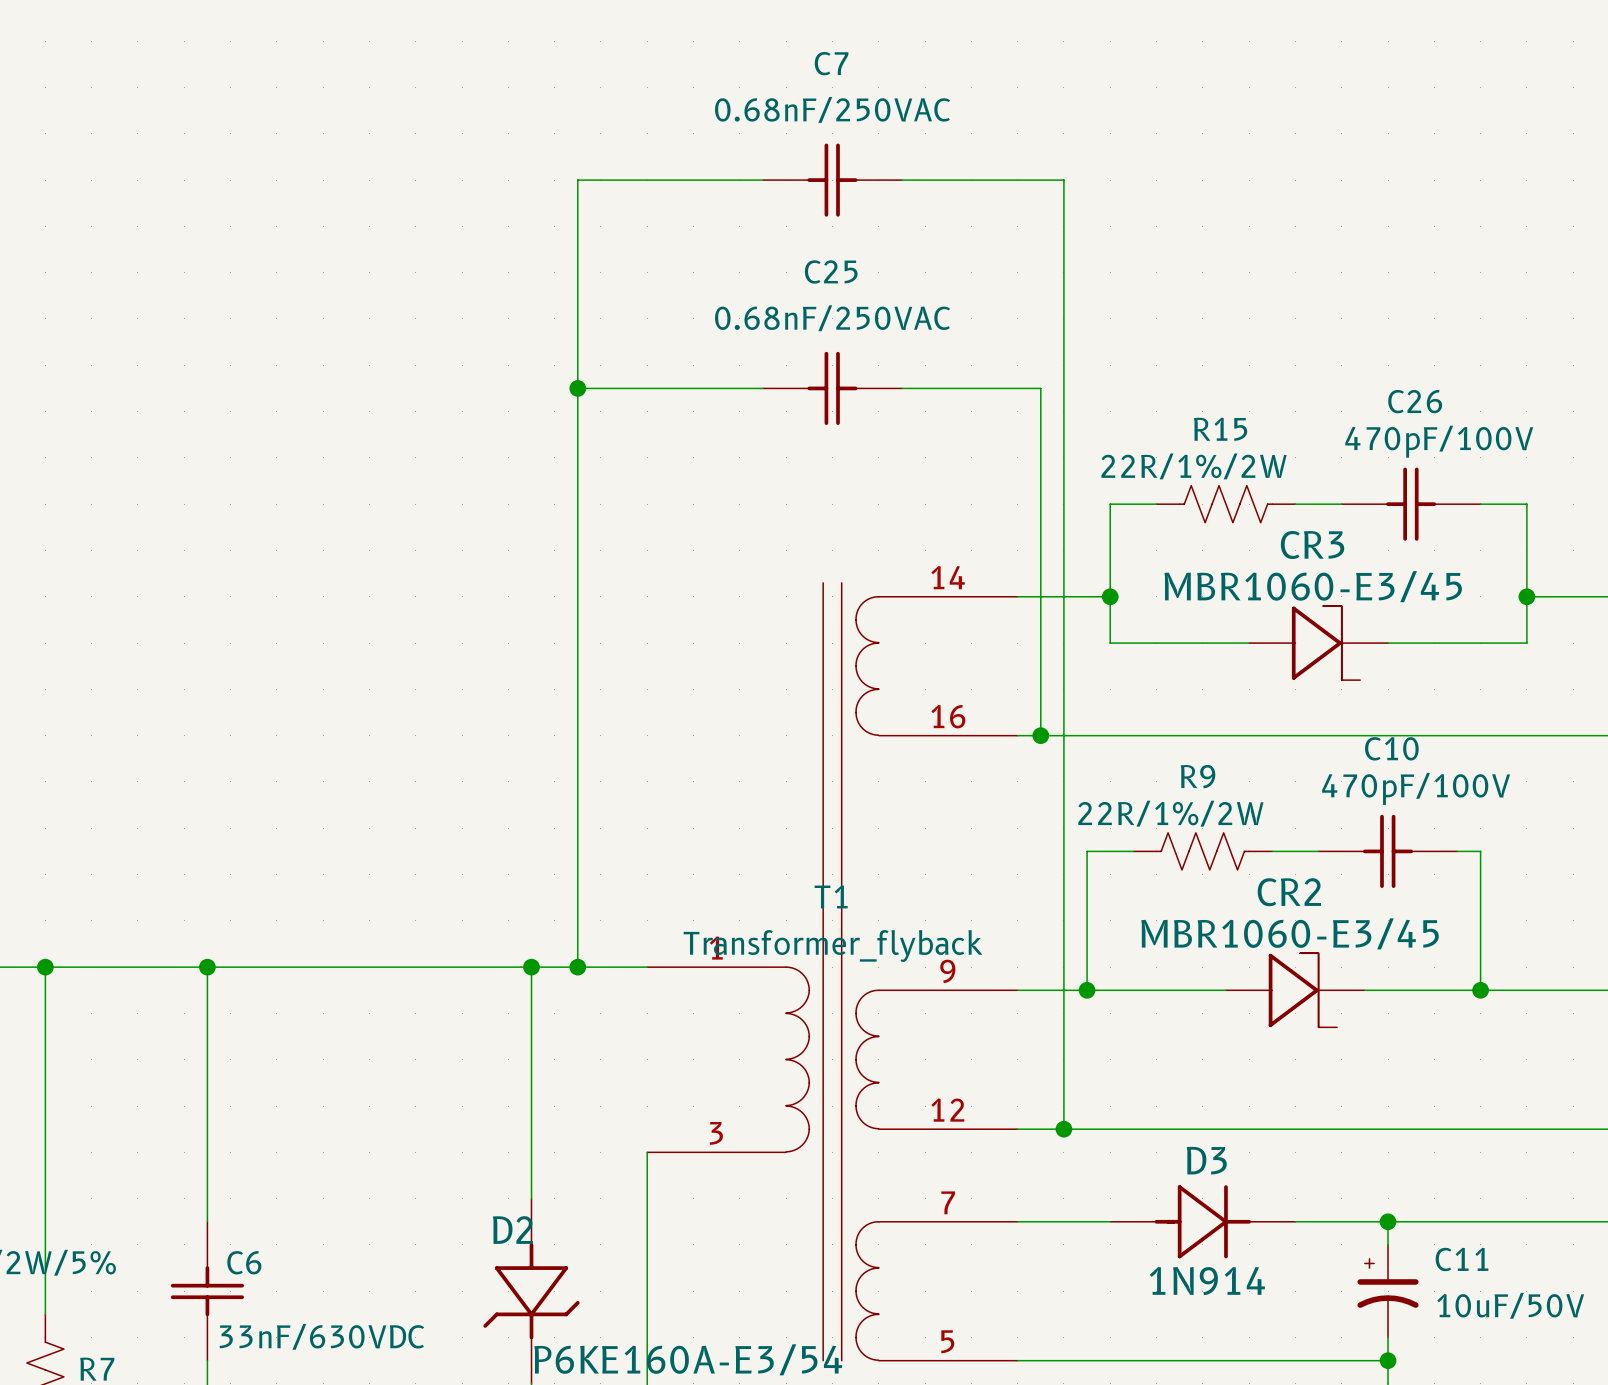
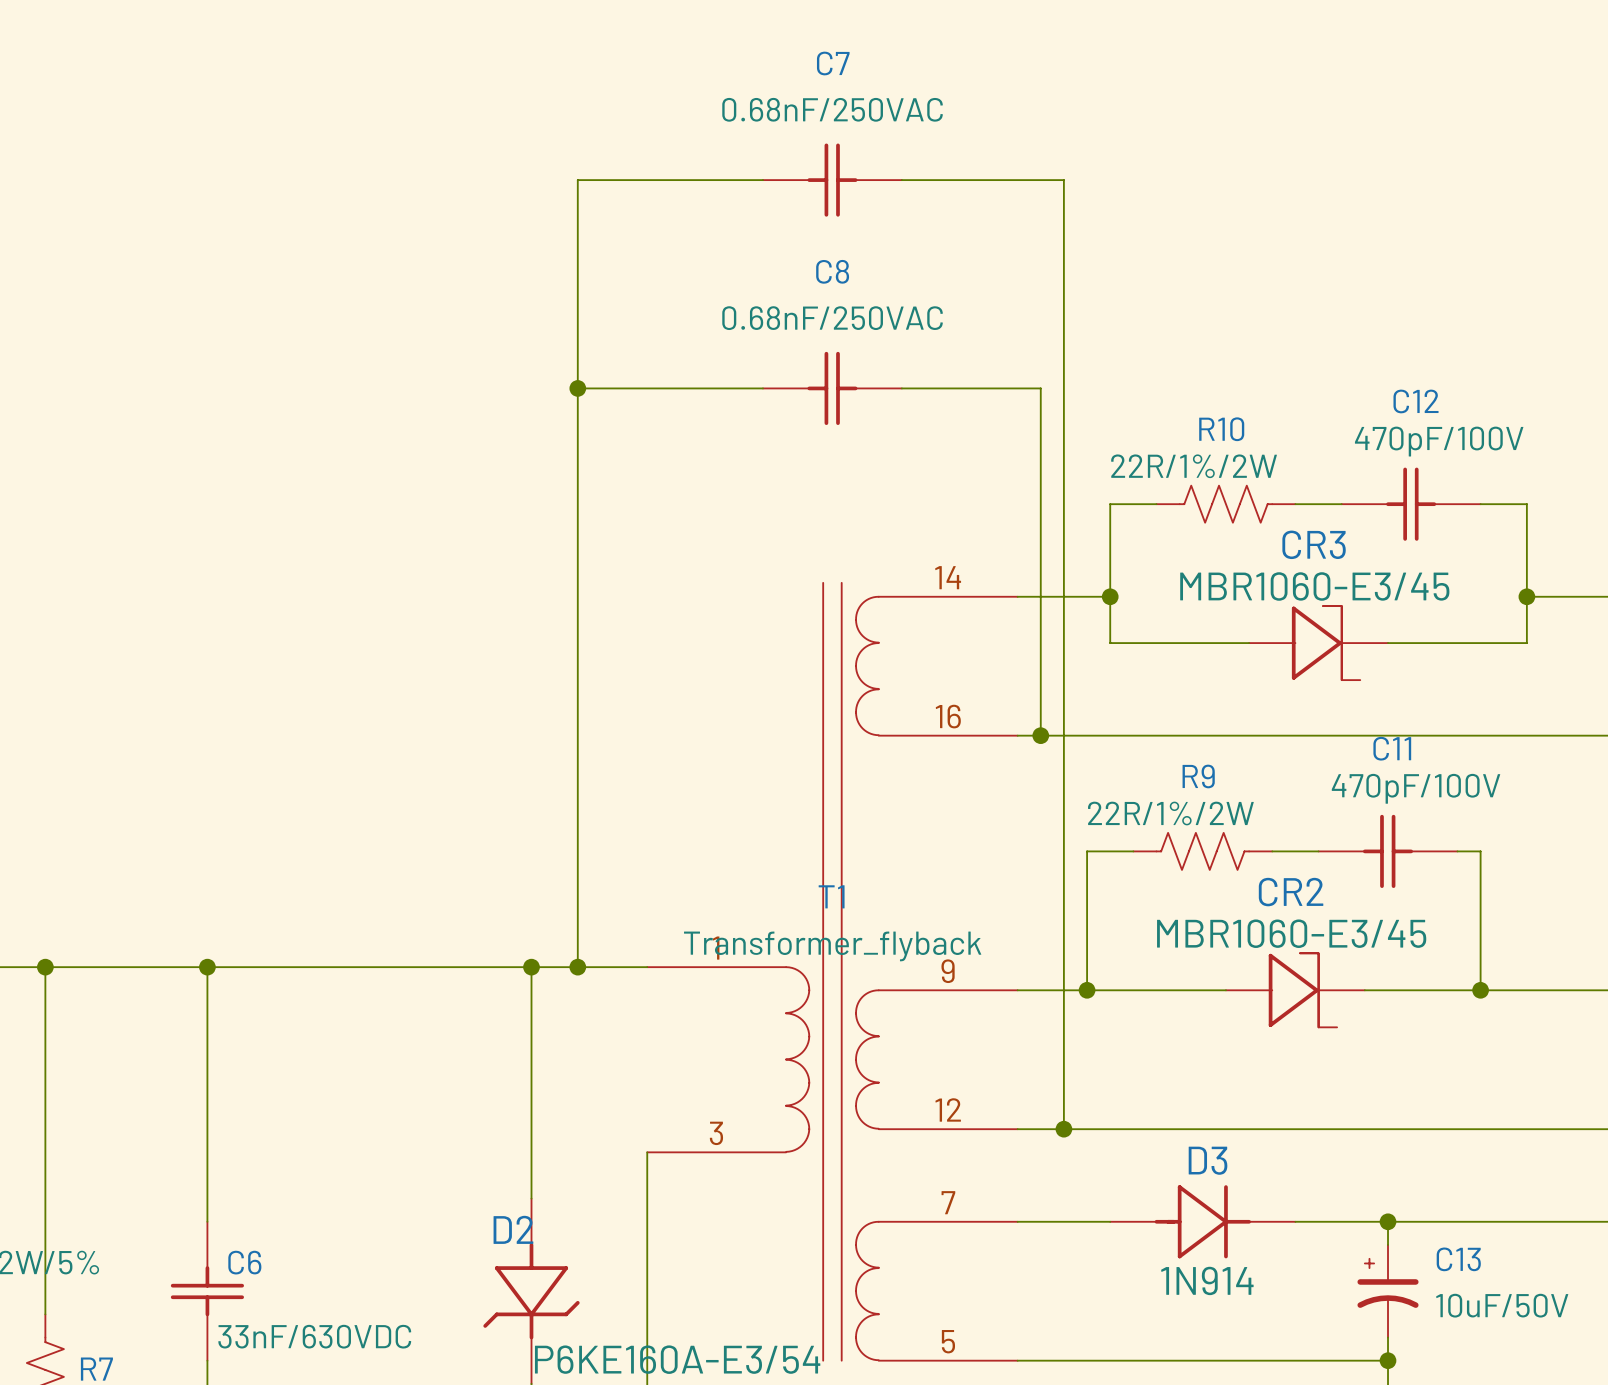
C25 name: C25 (831, 271) -> C8 (832, 271)
C26 name: C26 (1415, 401) -> C12 (1416, 401)
R15 name: R15 (1220, 429) -> R10 (1221, 429)
C10 name: C10 (1391, 748) -> C11 (1392, 748)
C11 name: C11 (1462, 1259) -> C13 (1458, 1259)

